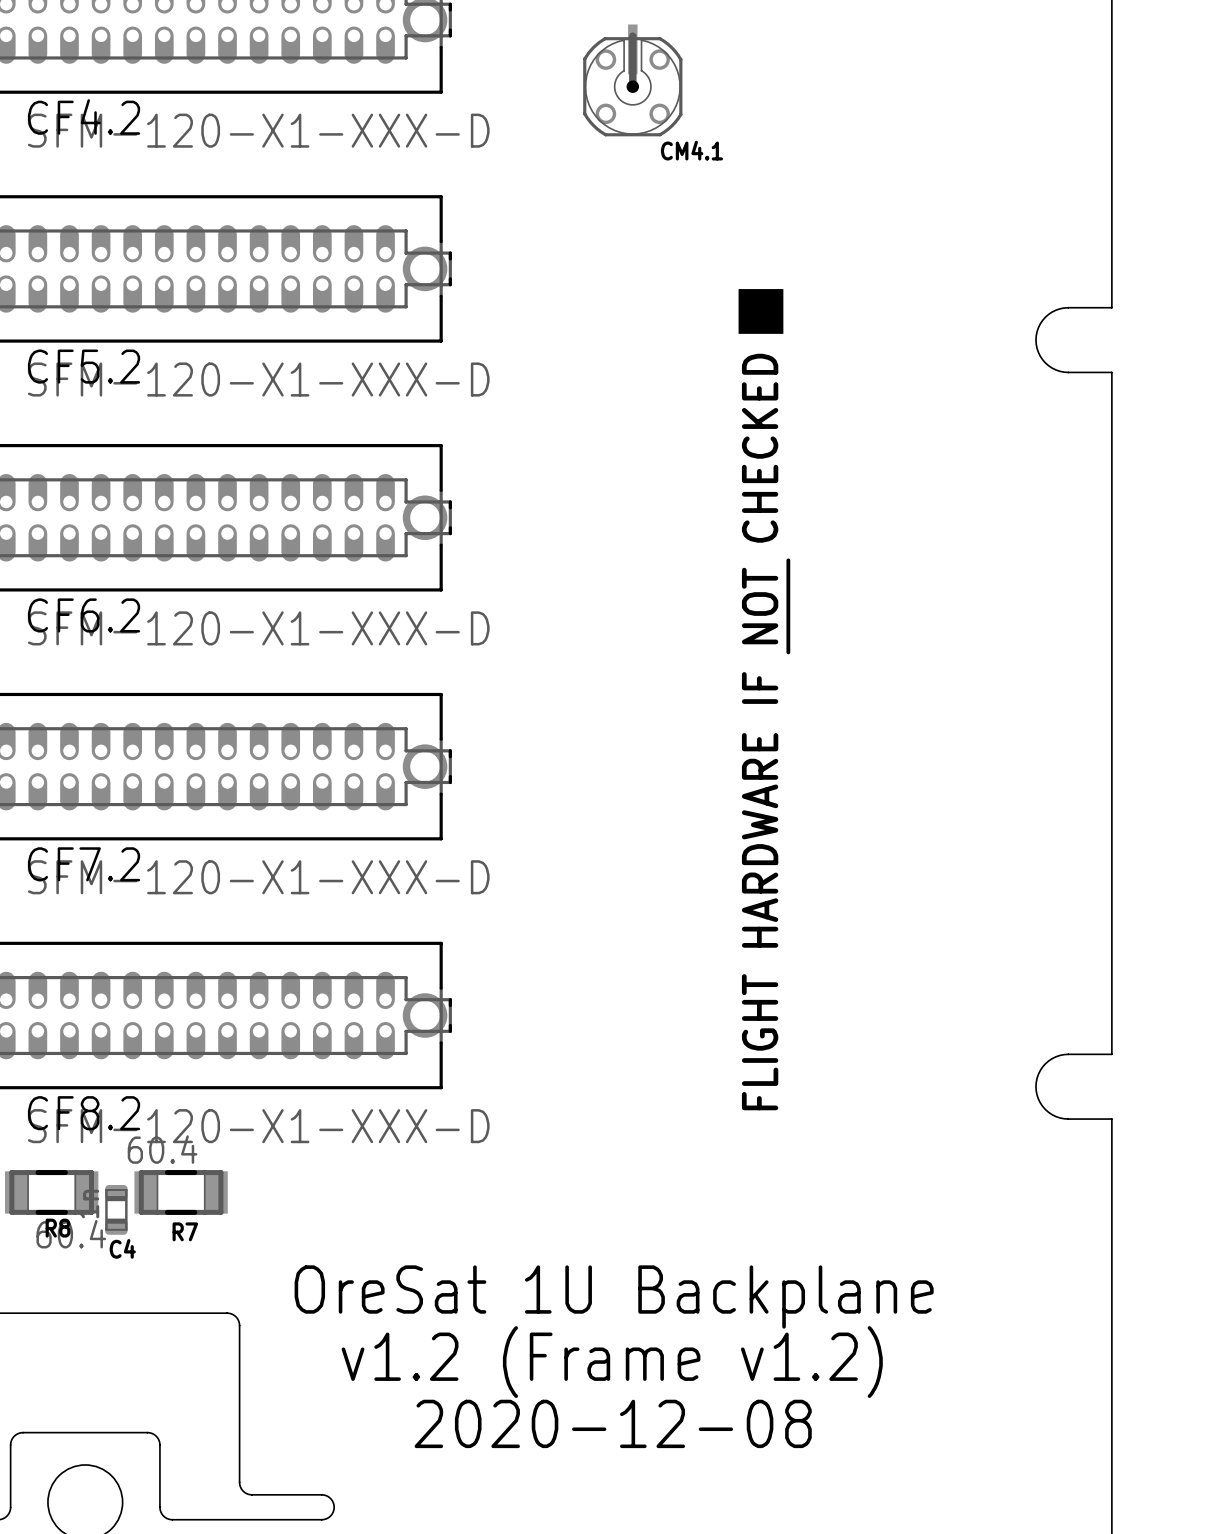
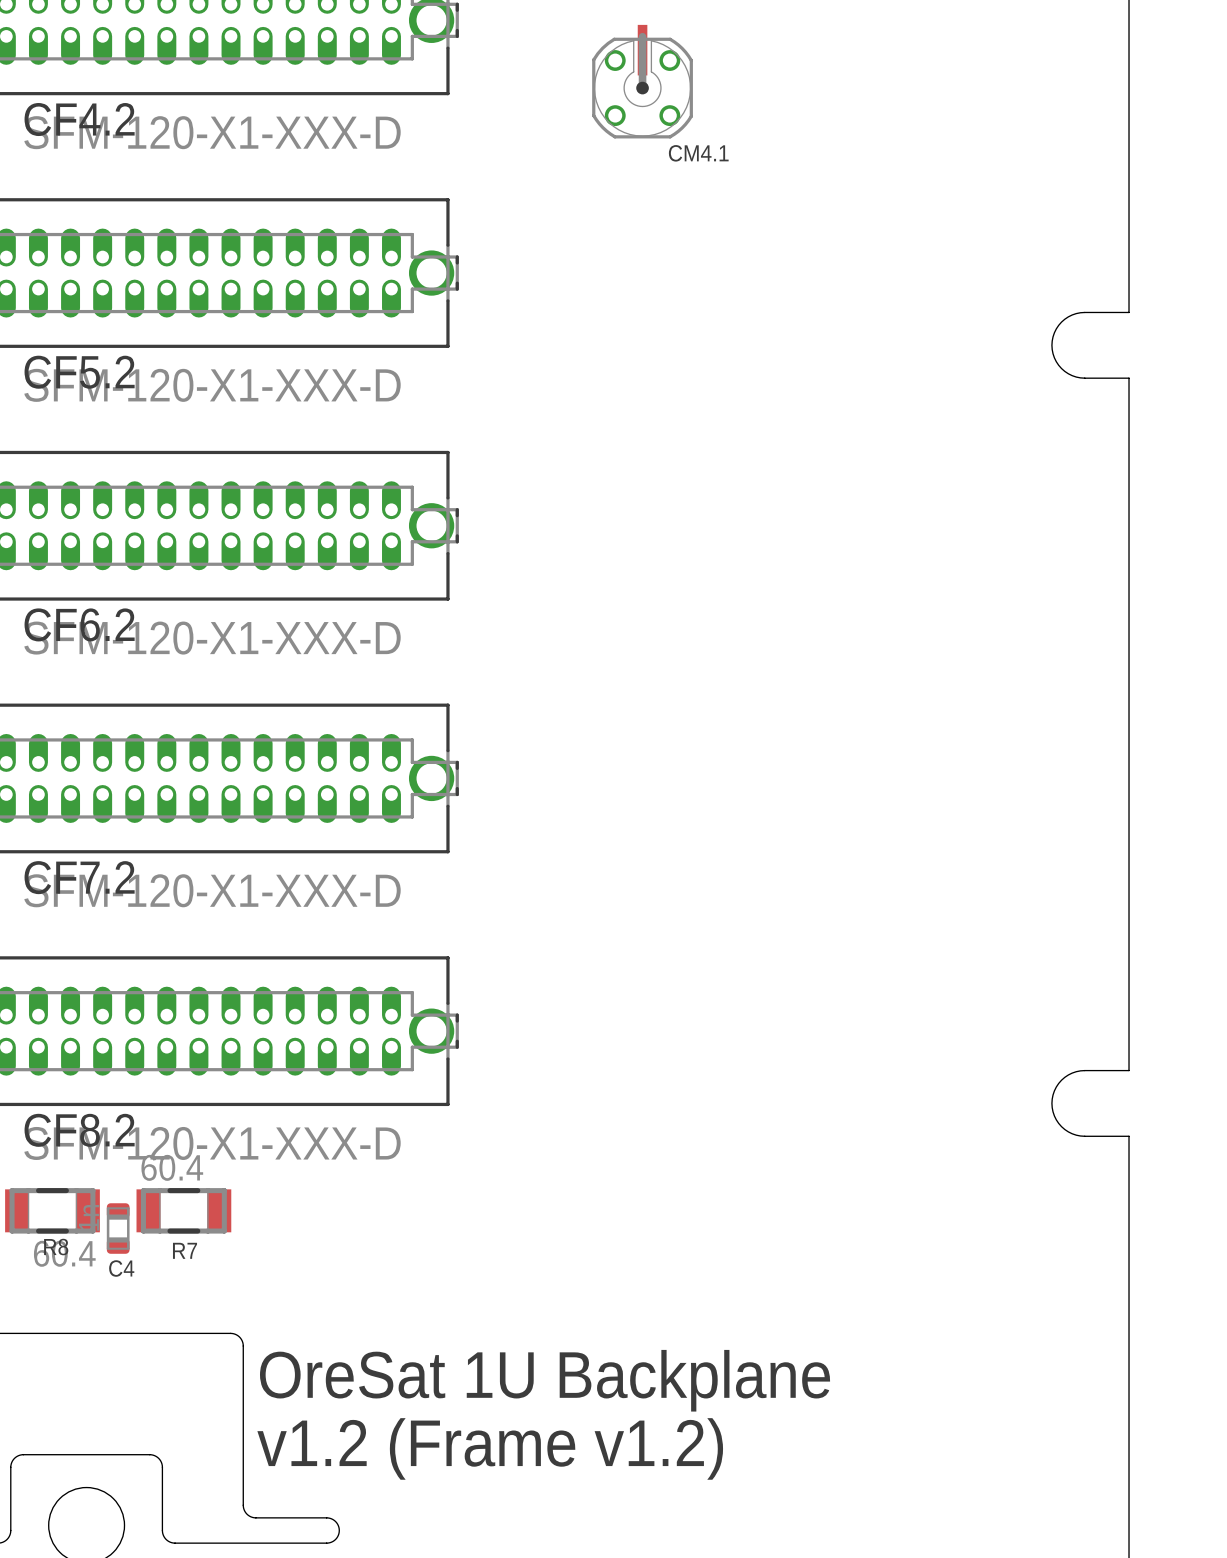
drawing: [738, 289, 791, 655] -> none
text position: OreSat 1U Backplane (614, 1296) -> OreSat 1U Backplane (545, 1380)
text position: v1.2 (Frame v1.2) (612, 1362) -> v1.2 (Frame v1.2) (490, 1448)
text: 2020-12-08 (613, 1423) -> none

